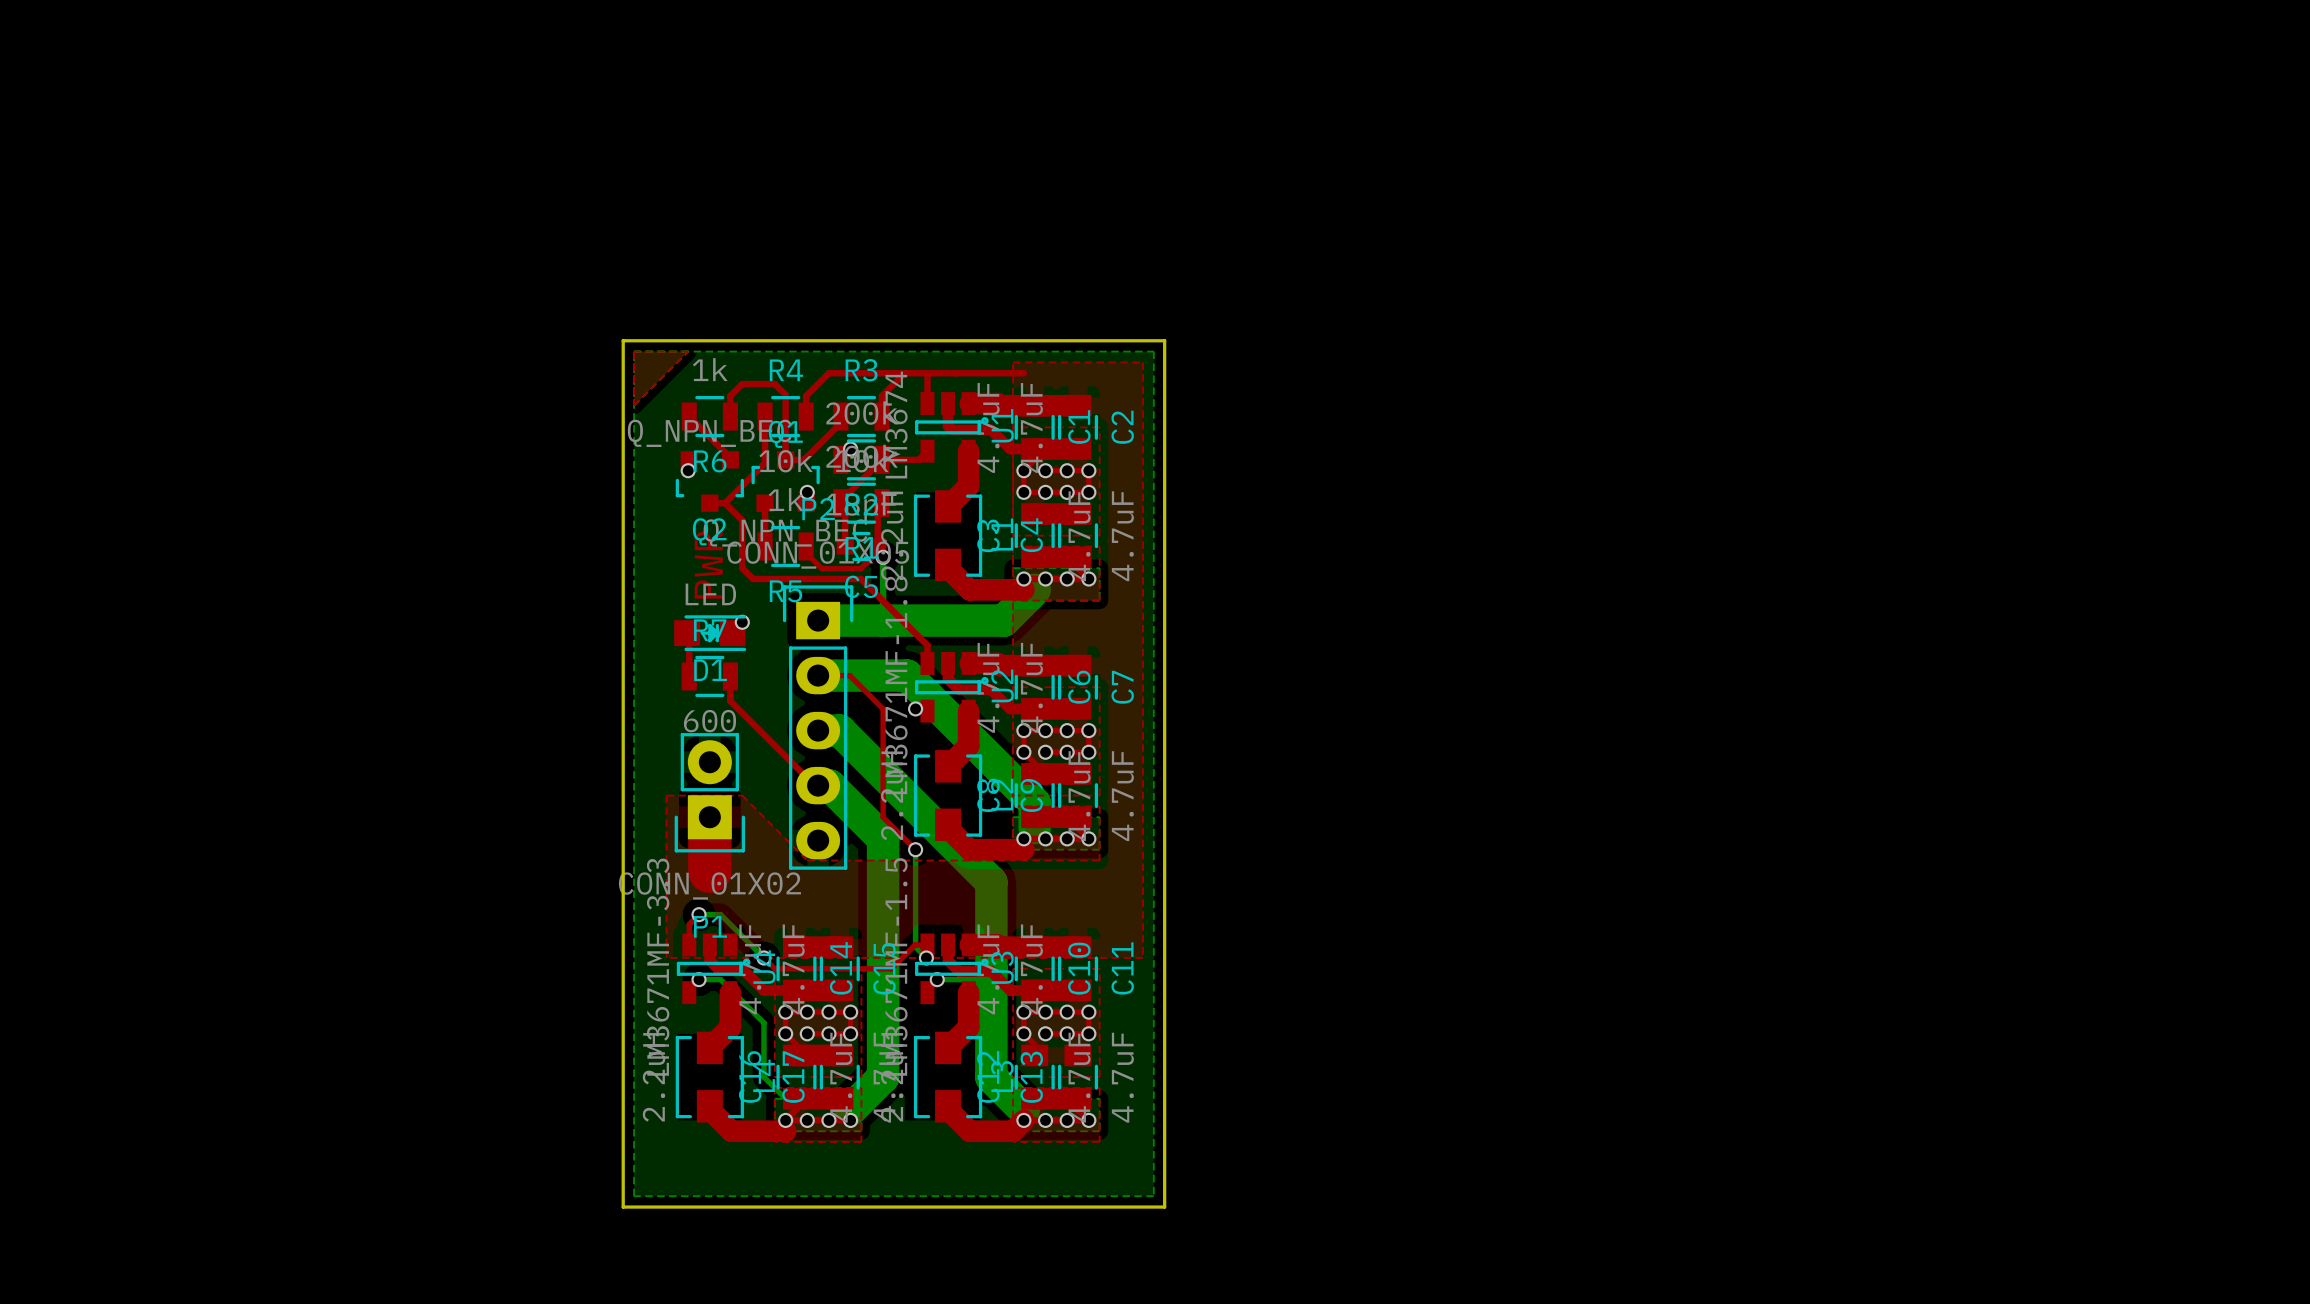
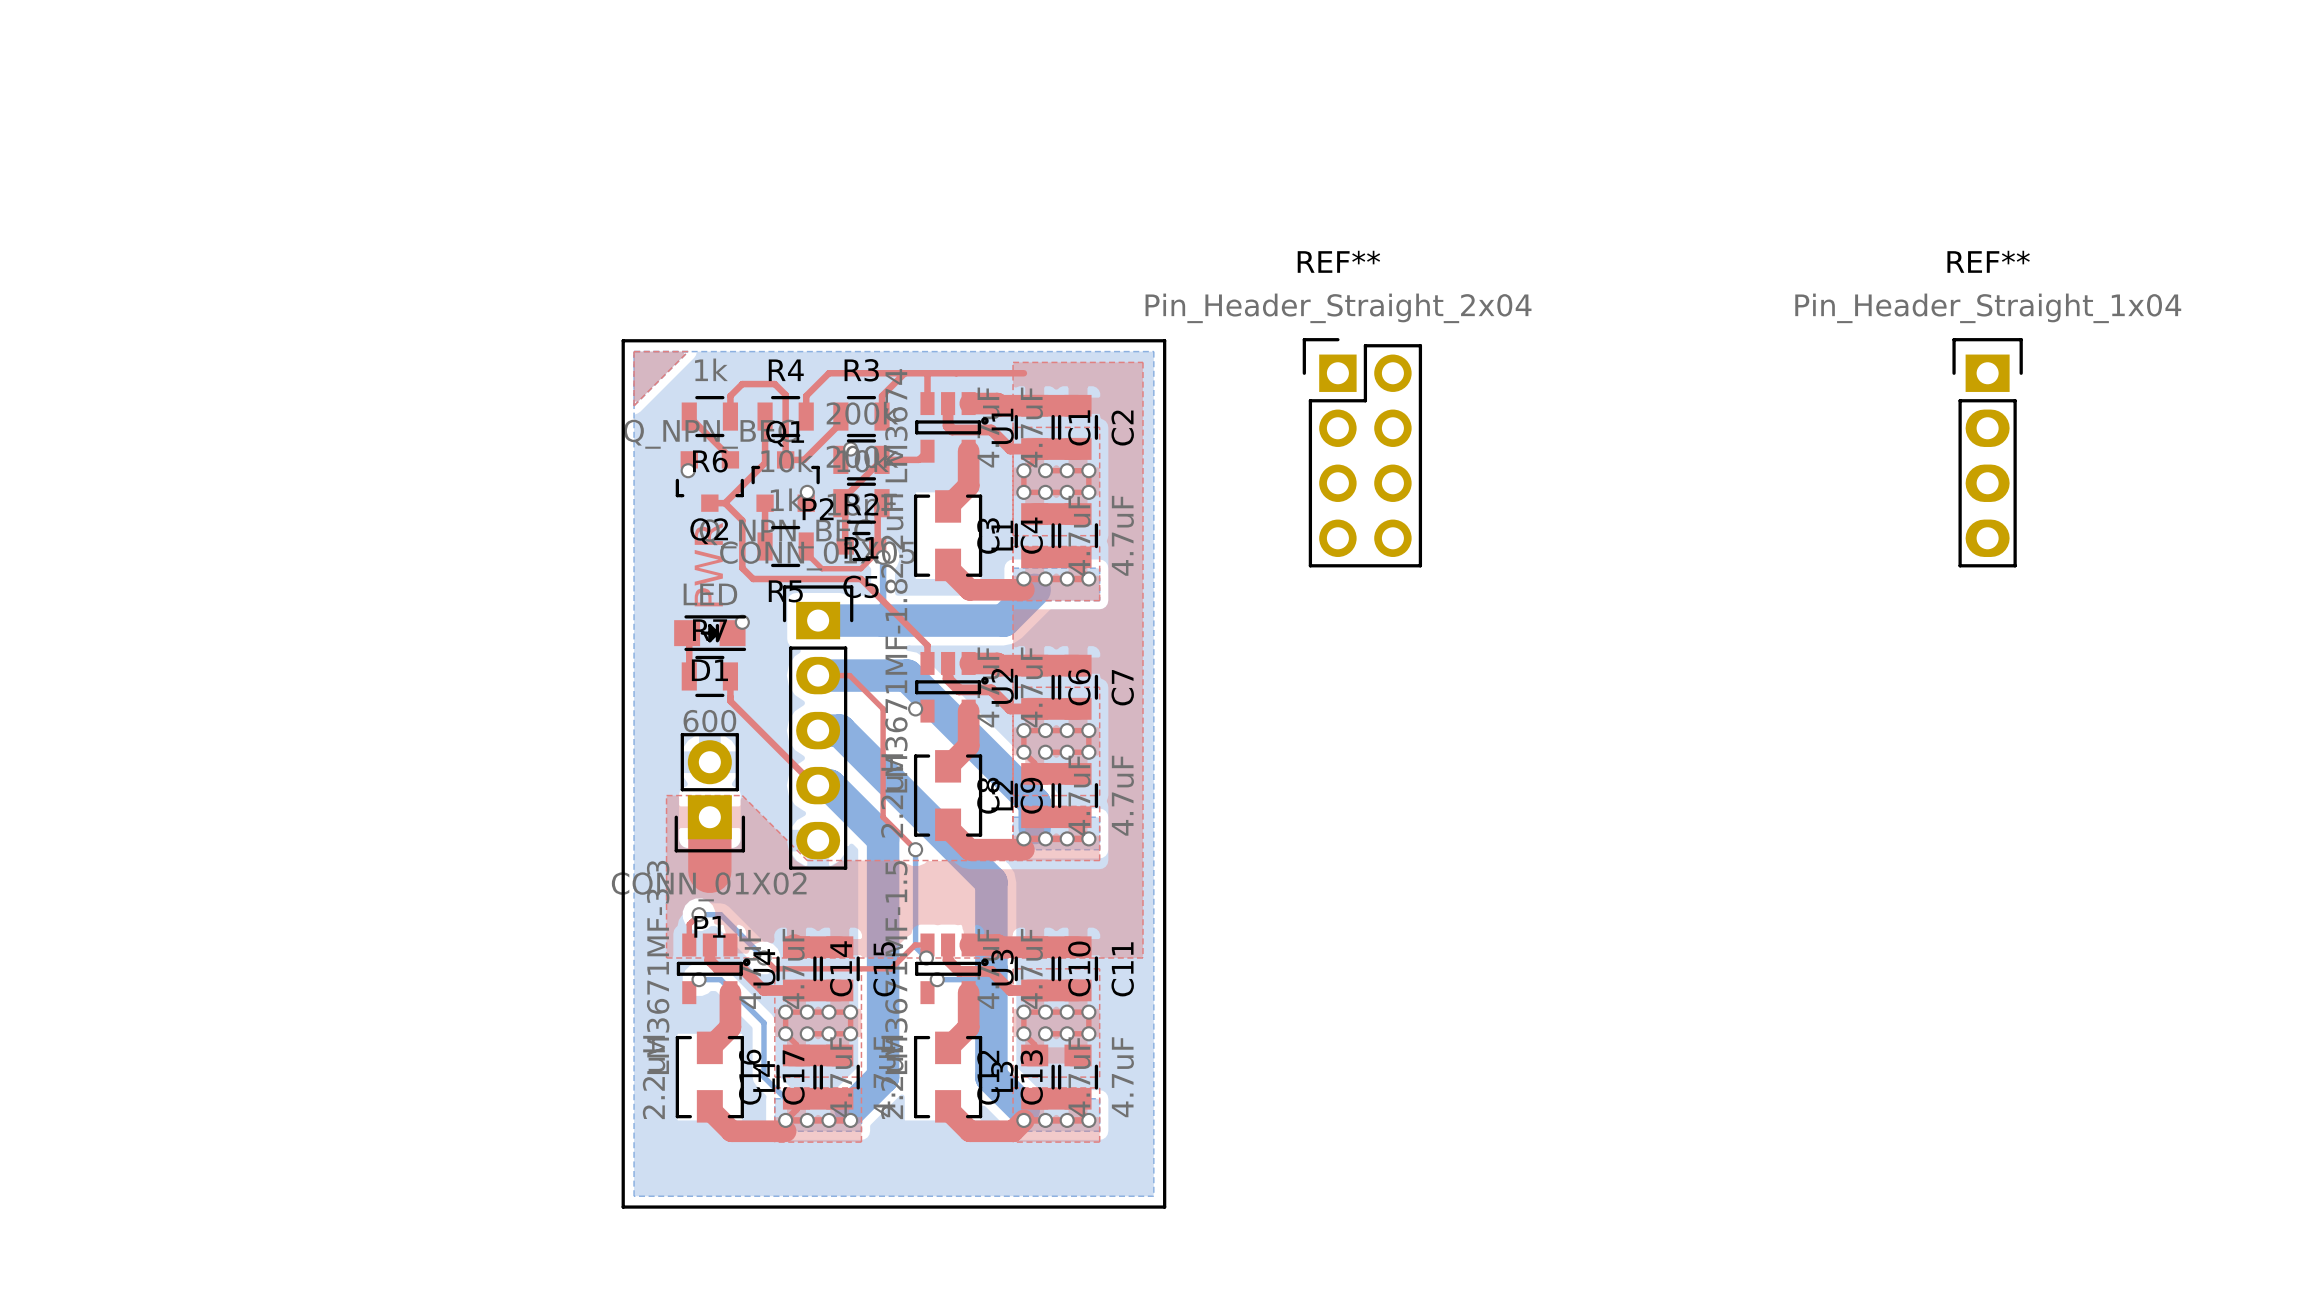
REF**: none -> Pin_Header_Straight_2x04 (1362, 452)
REF**: none -> Pin_Header_Straight_1x04 (1987, 452)

